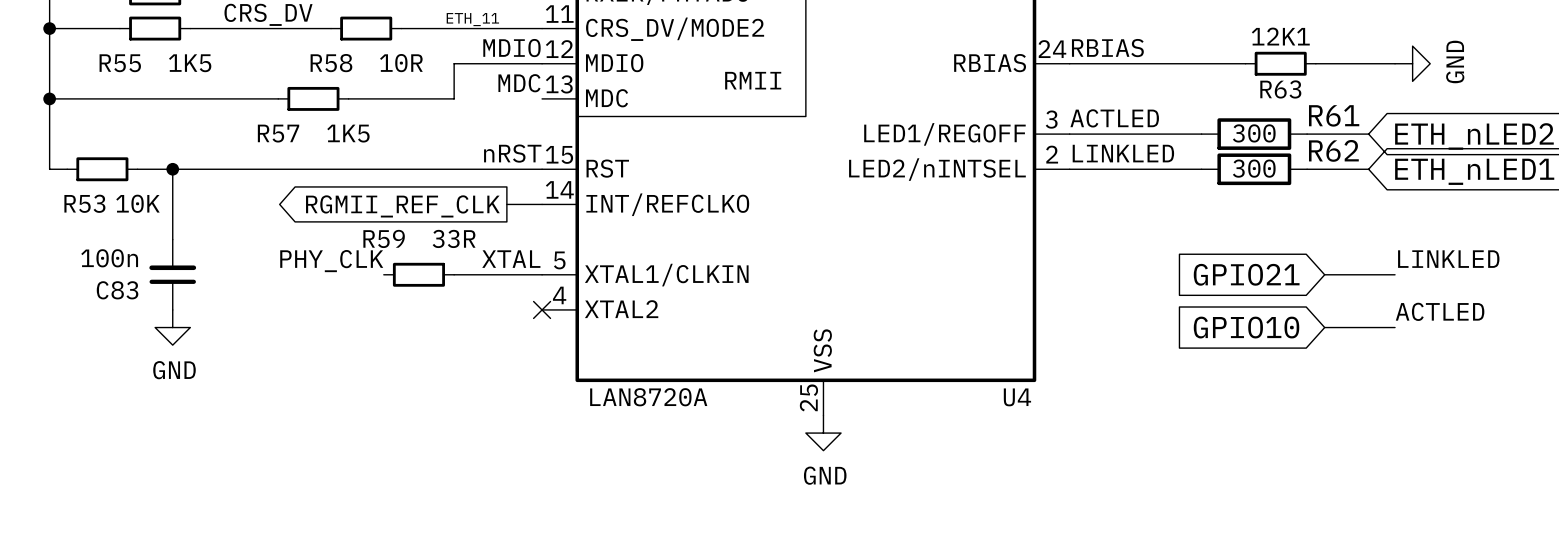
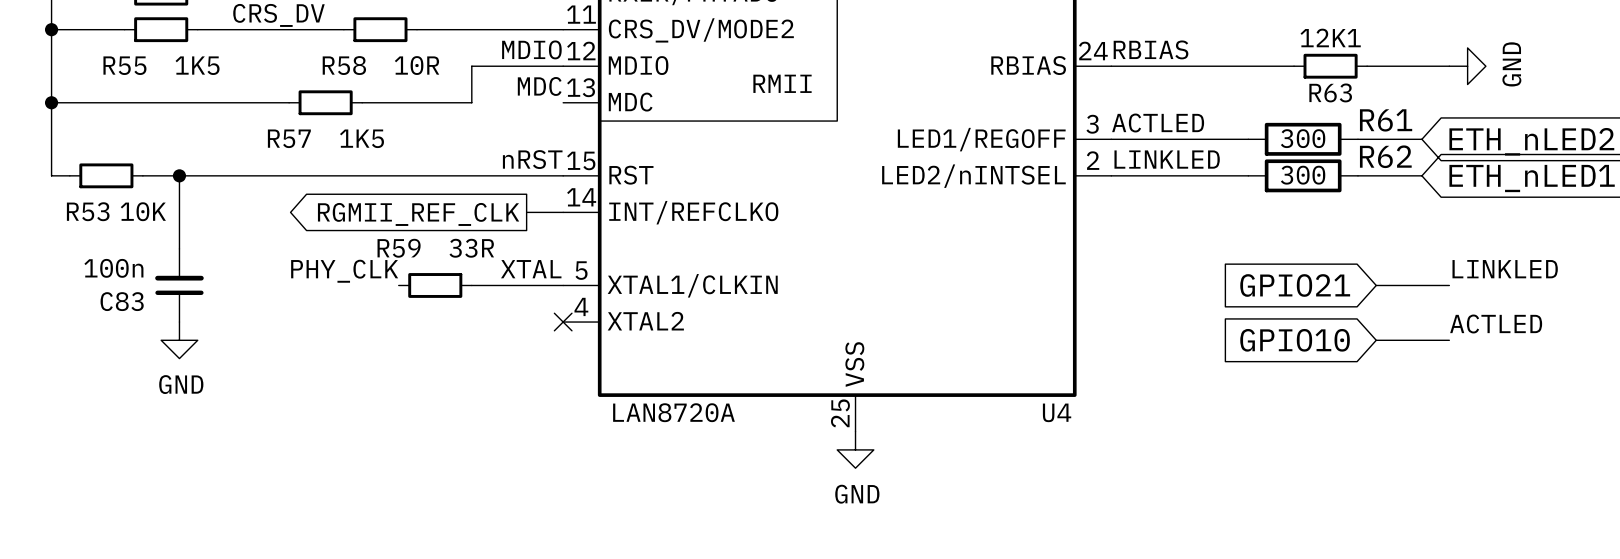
label: ETH_11 (472, 19) -> none

